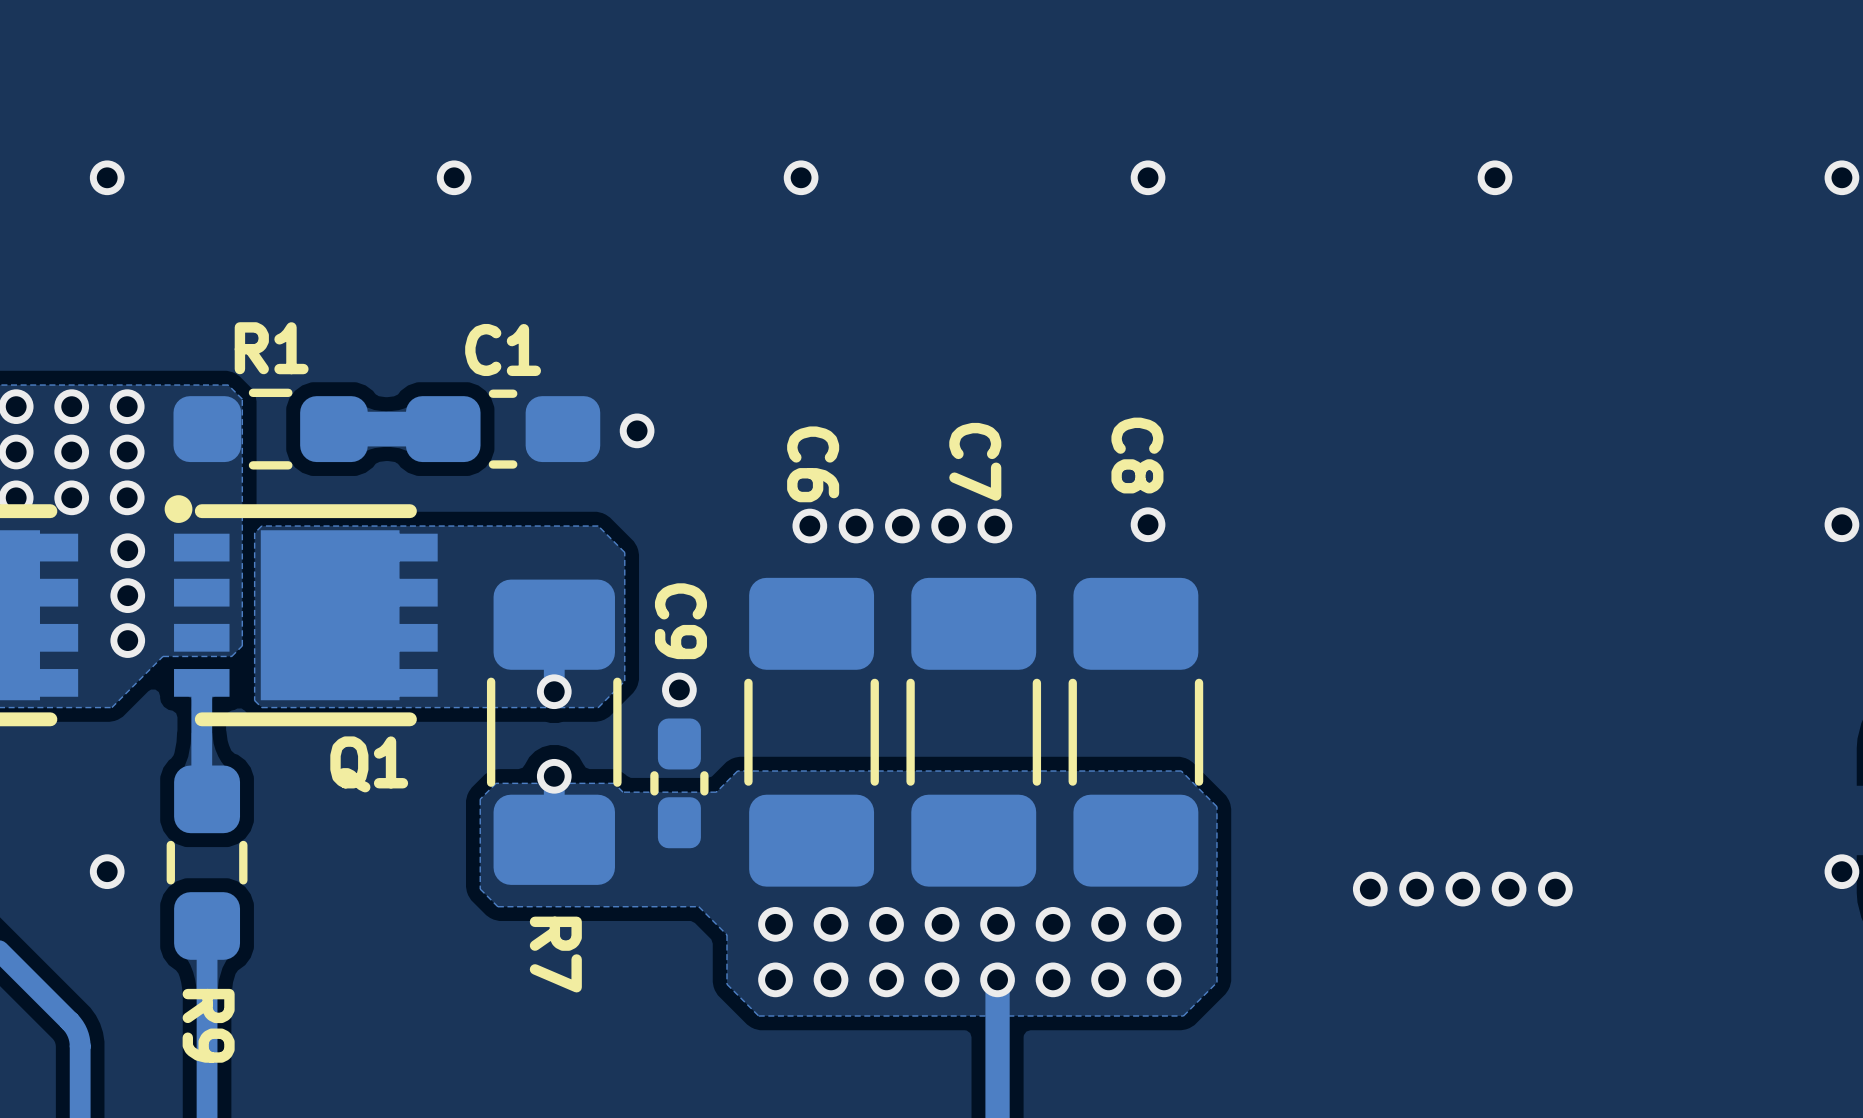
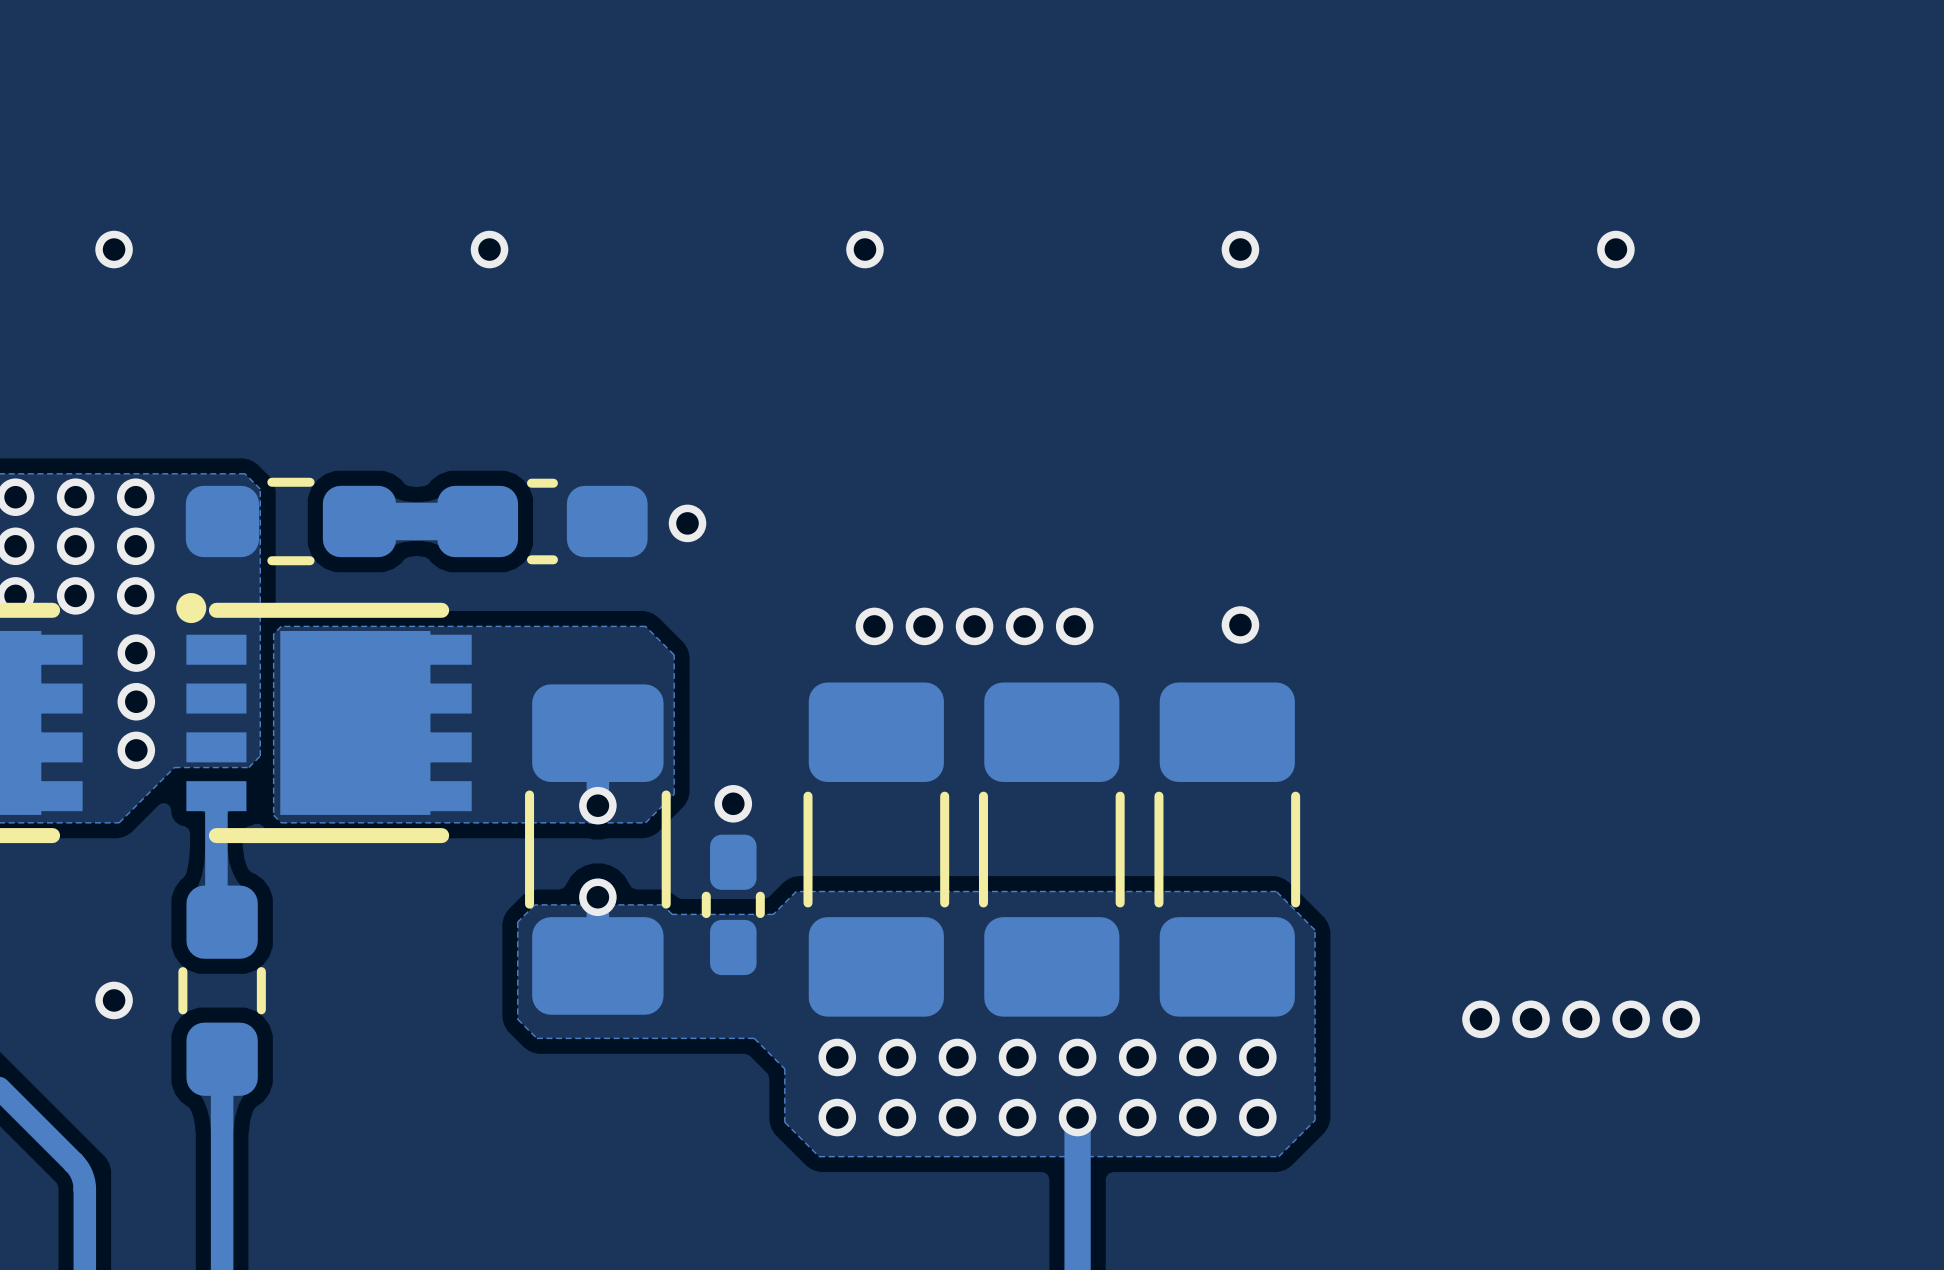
R1 name: R1 (271, 348) -> none
C1 name: C1 (503, 349) -> none
C8 name: C8 (1137, 455) -> none
C7 name: C7 (975, 461) -> none
C6 name: C6 (813, 464) -> none
C9 name: C9 (680, 621) -> none
Q1 name: Q1 (369, 764) -> none
R7 name: R7 (555, 954) -> none
R9 name: R9 (208, 1025) -> none

